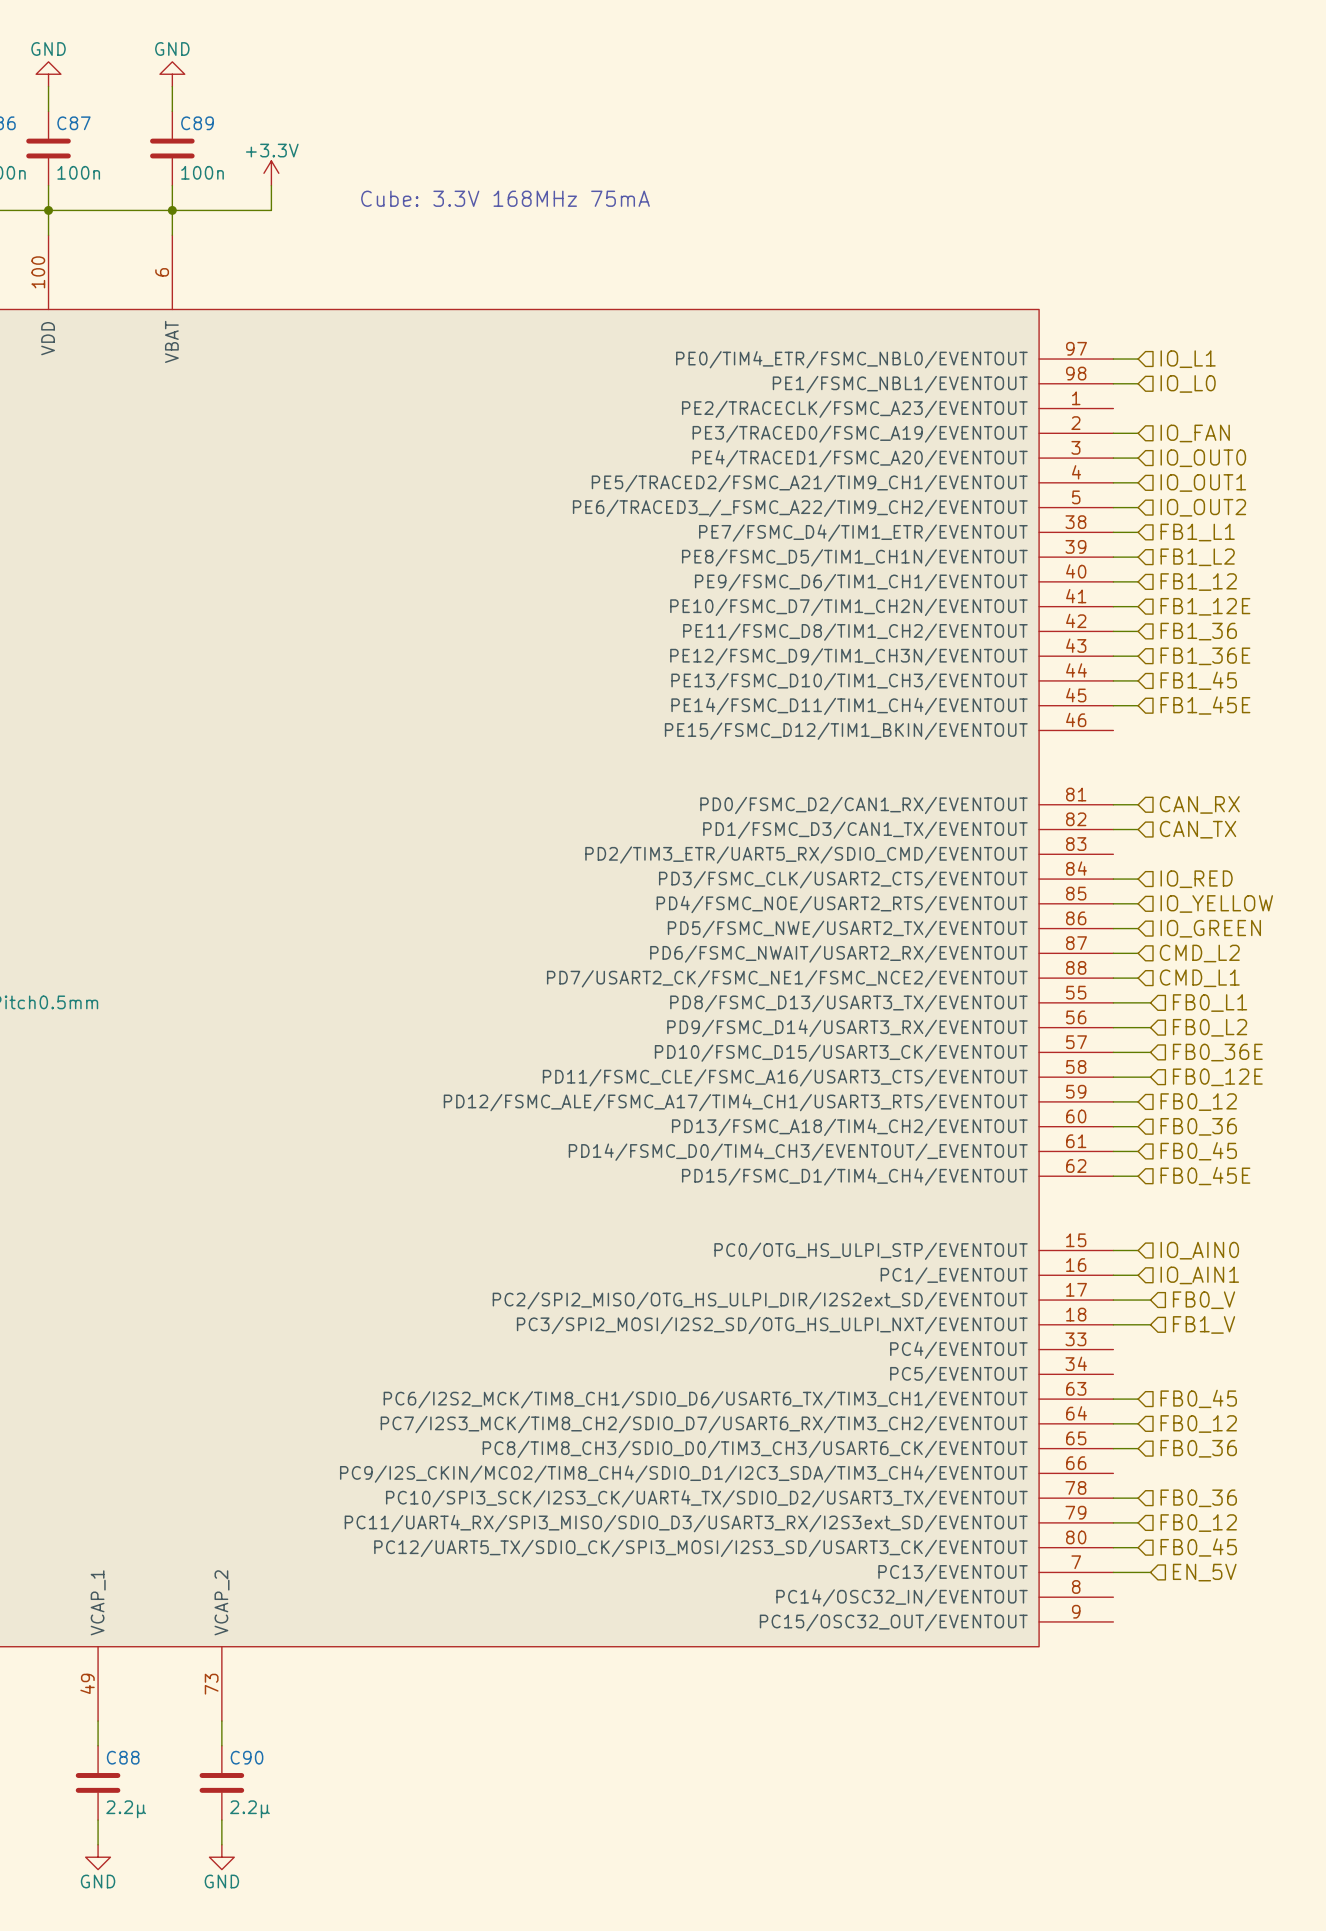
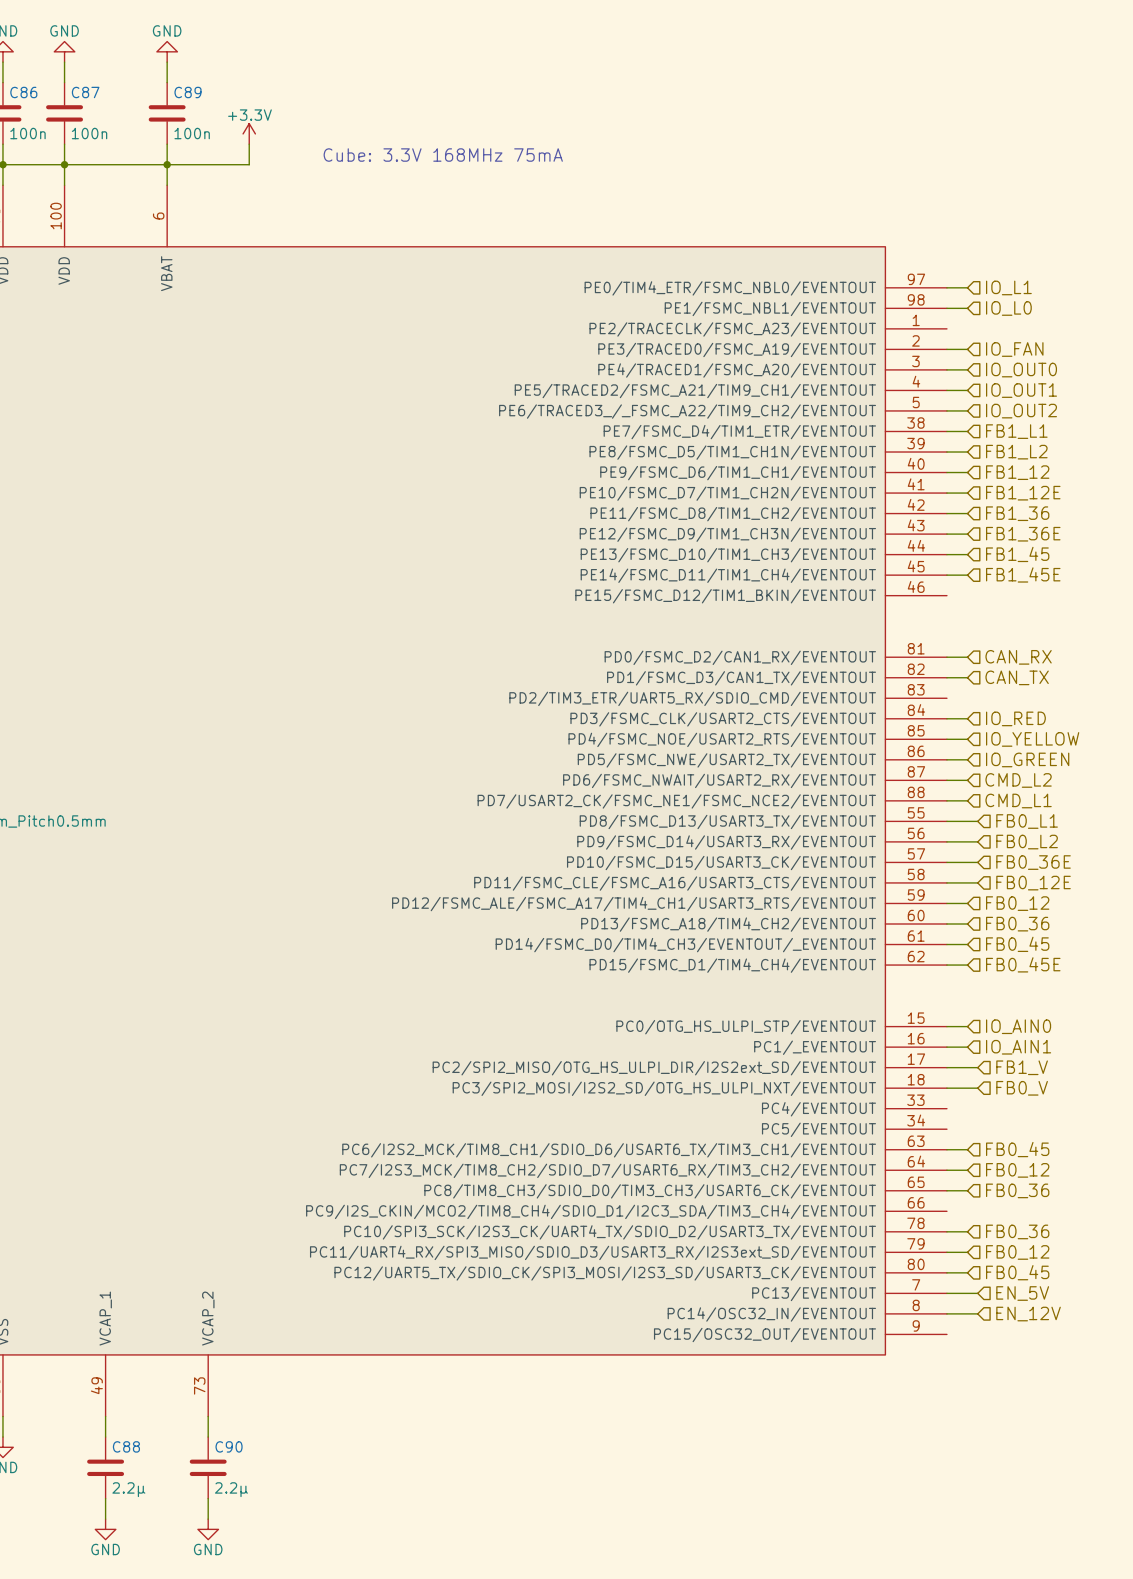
hierarchical label: FB0_V (1204, 1300) -> FB1_V (1022, 1067)
hierarchical label: FB1_V (1204, 1324) -> FB0_V (1022, 1088)
wire: none -> (946, 1313) (977, 1313)
hierarchical label: none -> EN_12V (1028, 1314)

